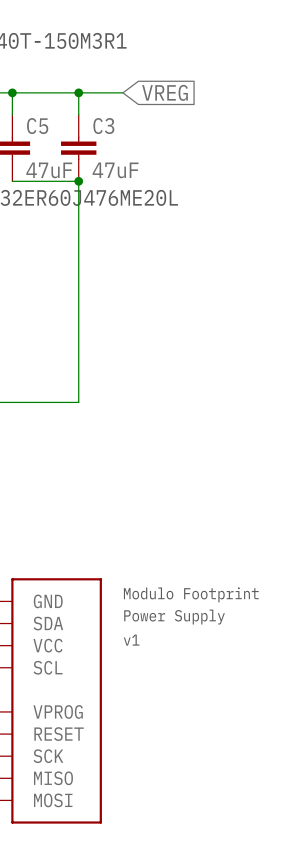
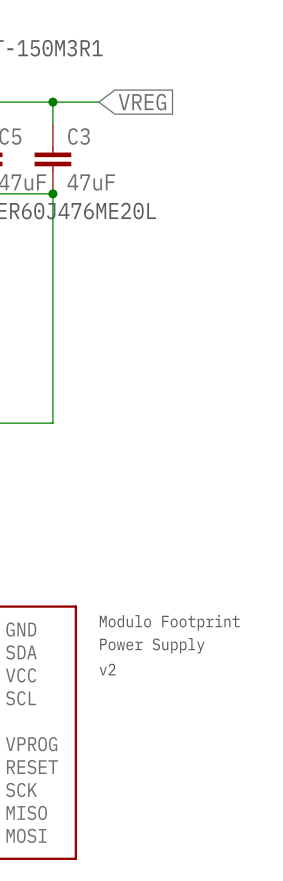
part text: v1 (131, 640) -> v2 (107, 669)

